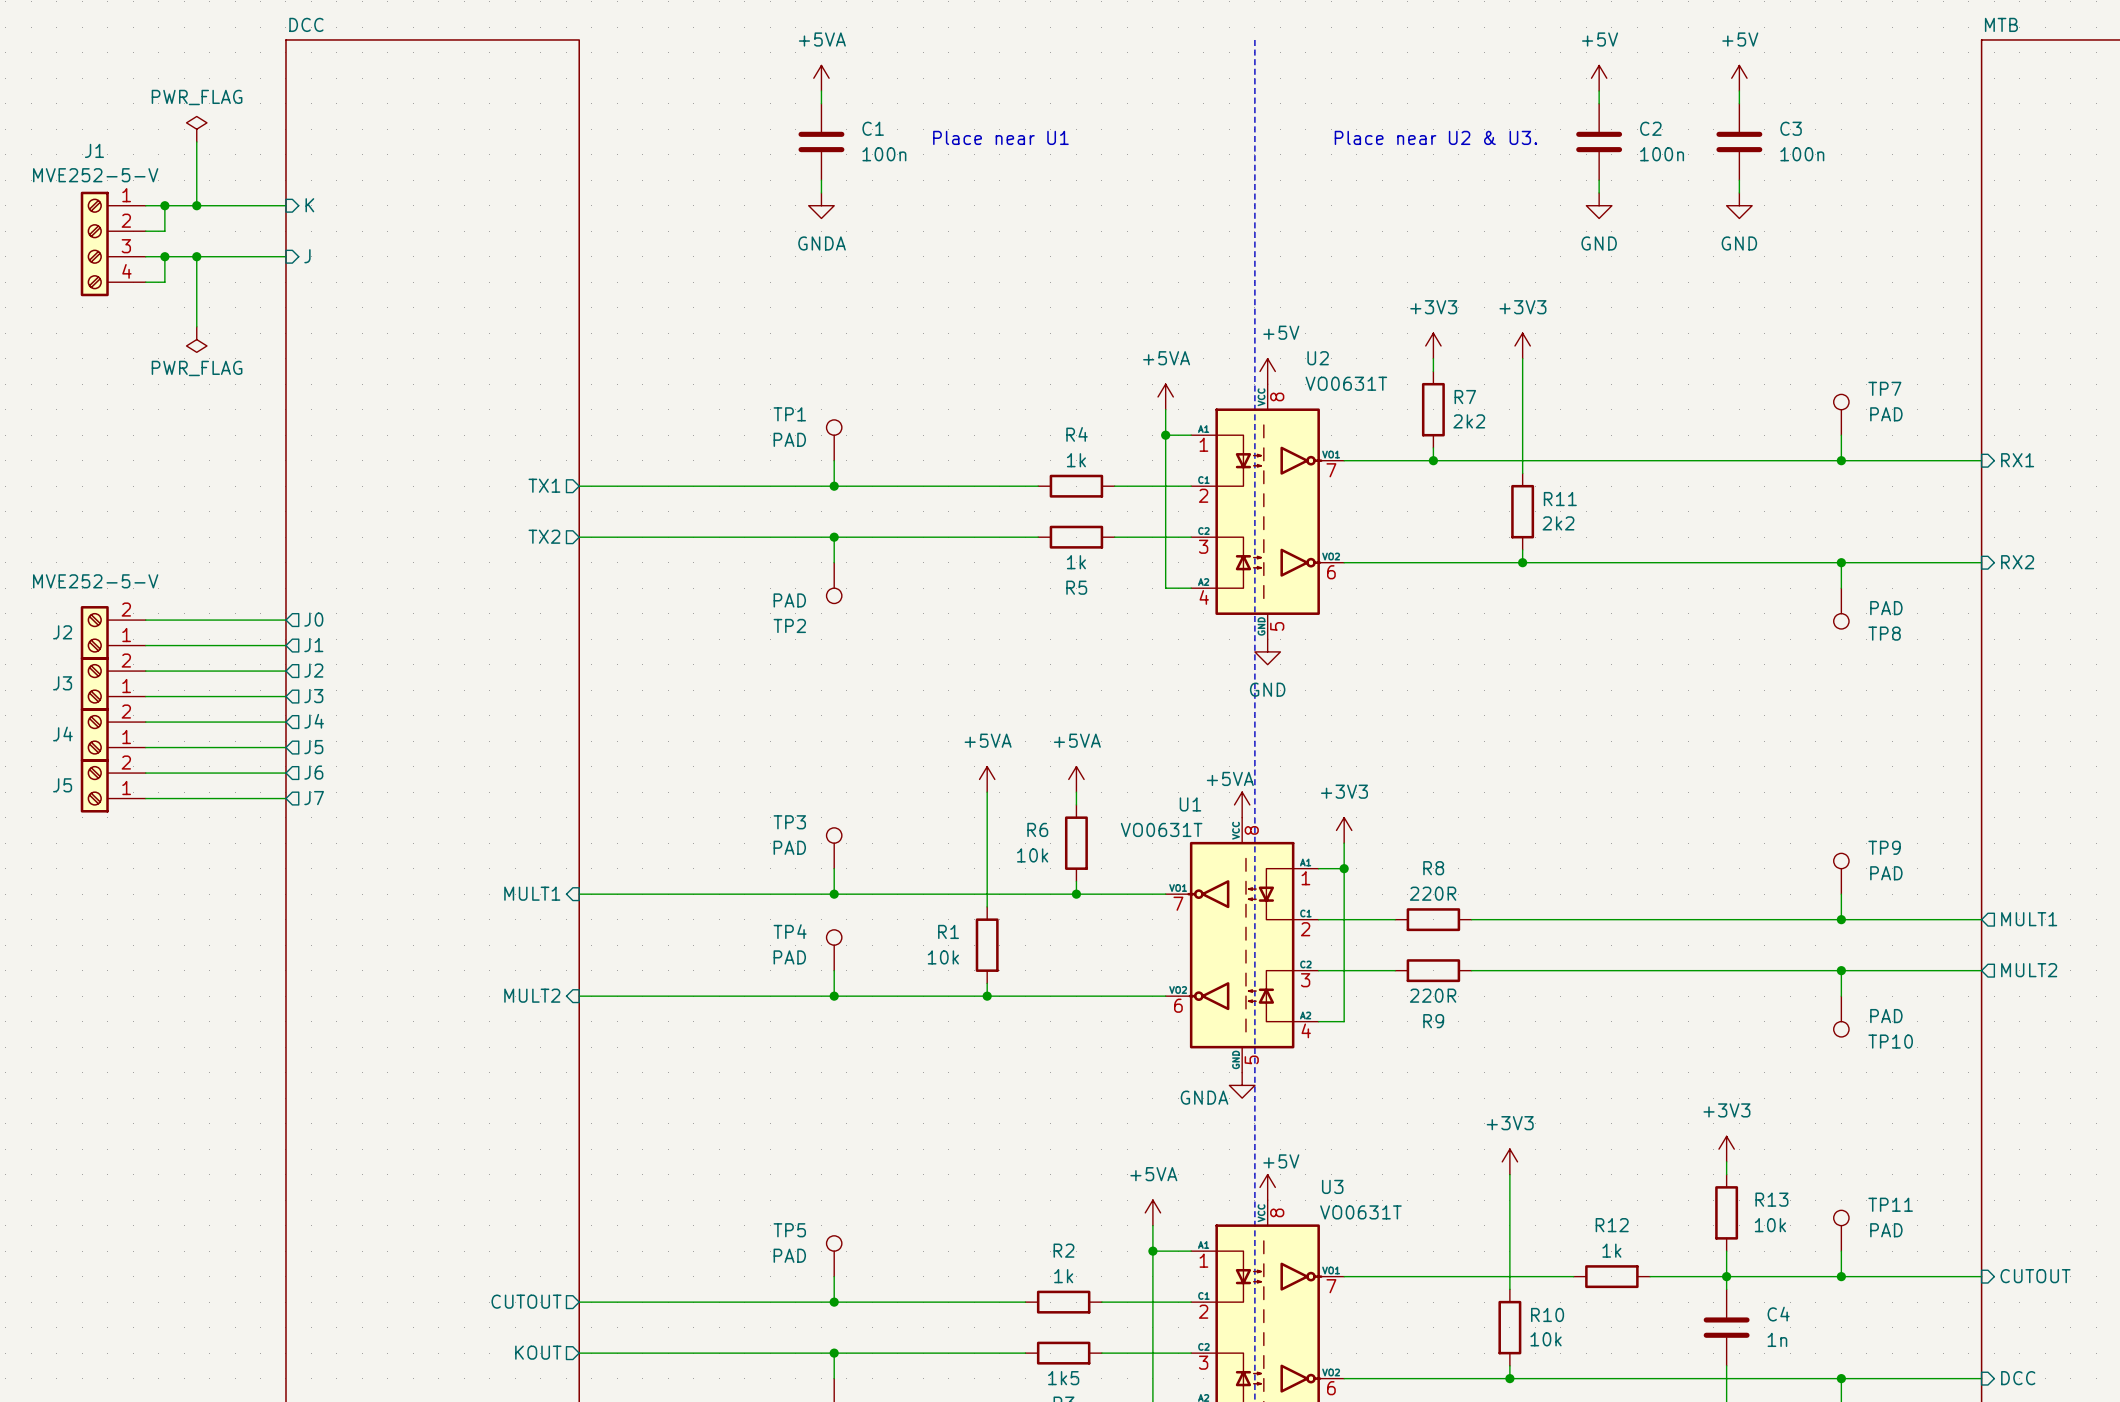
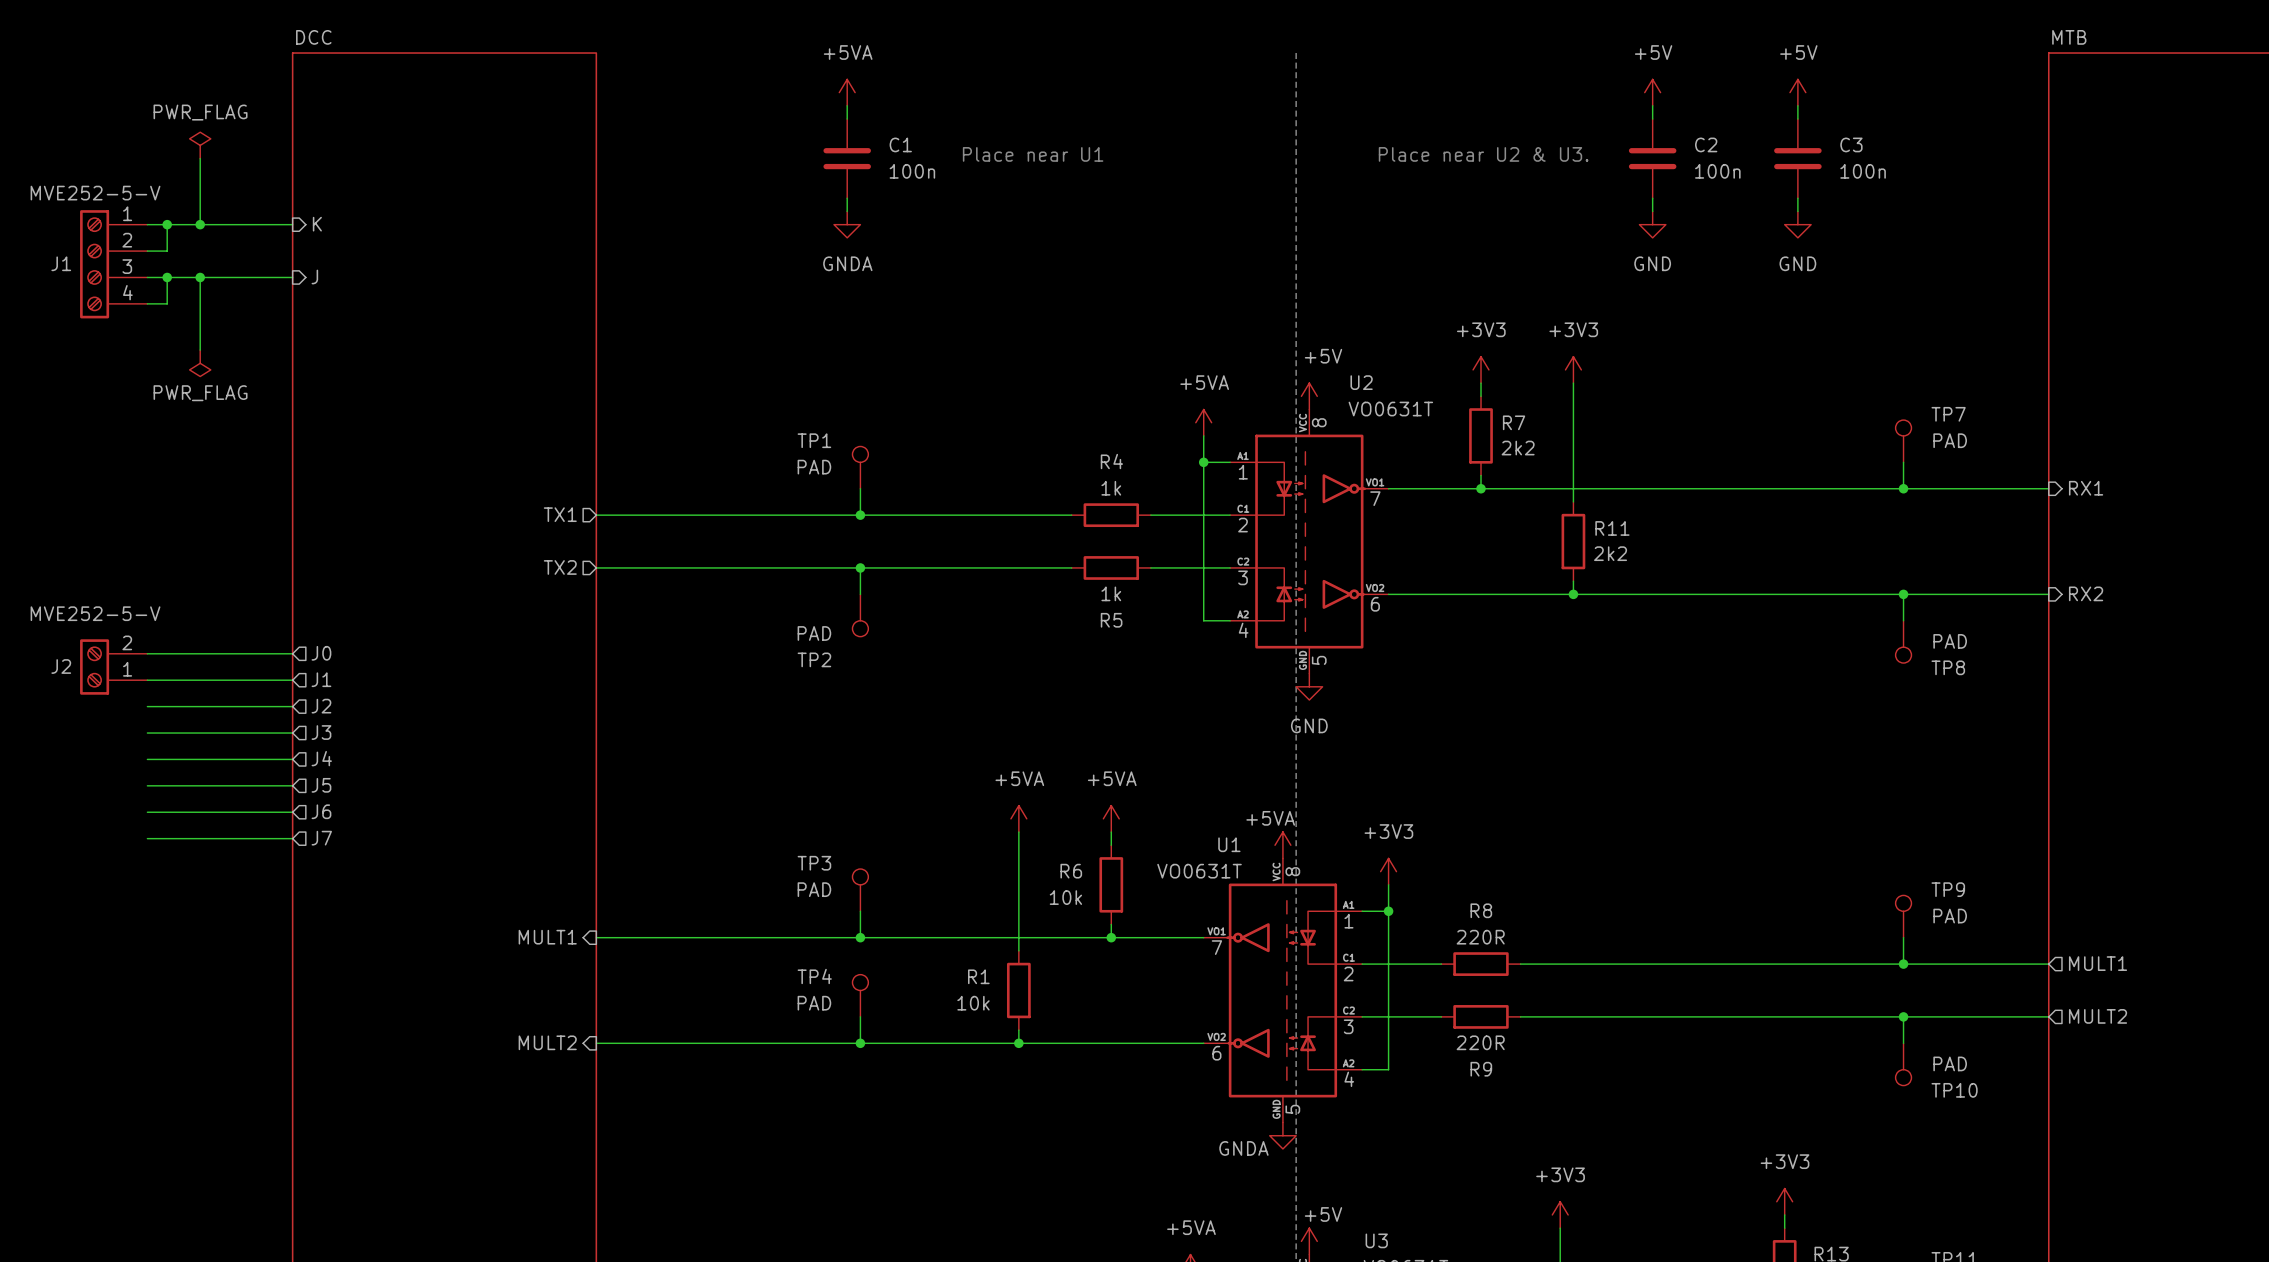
J1 name position: J1 (94, 150) -> J1 (61, 263)
J3: (113, 683) -> none
J4: (113, 734) -> none
J5: (113, 785) -> none

